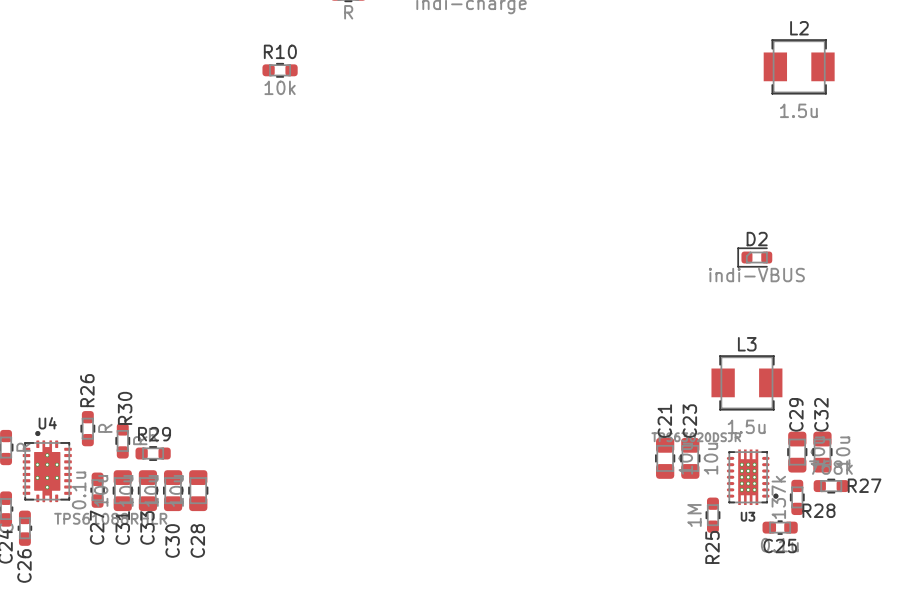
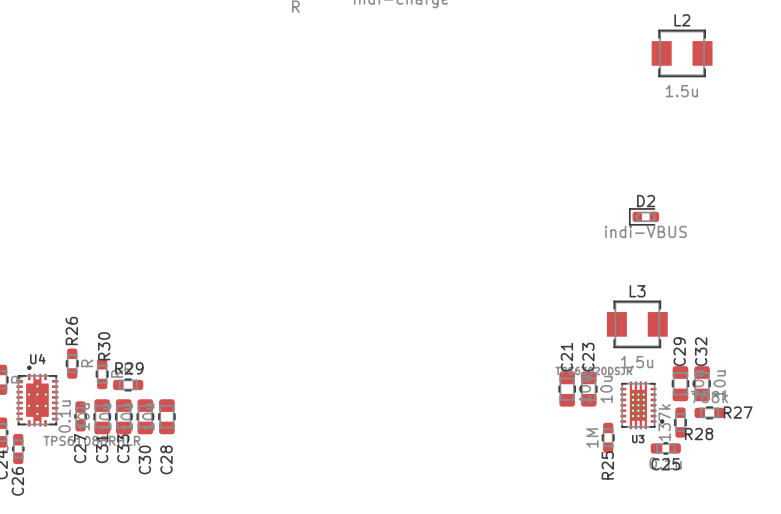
R10: 10k (280, 70) -> none

